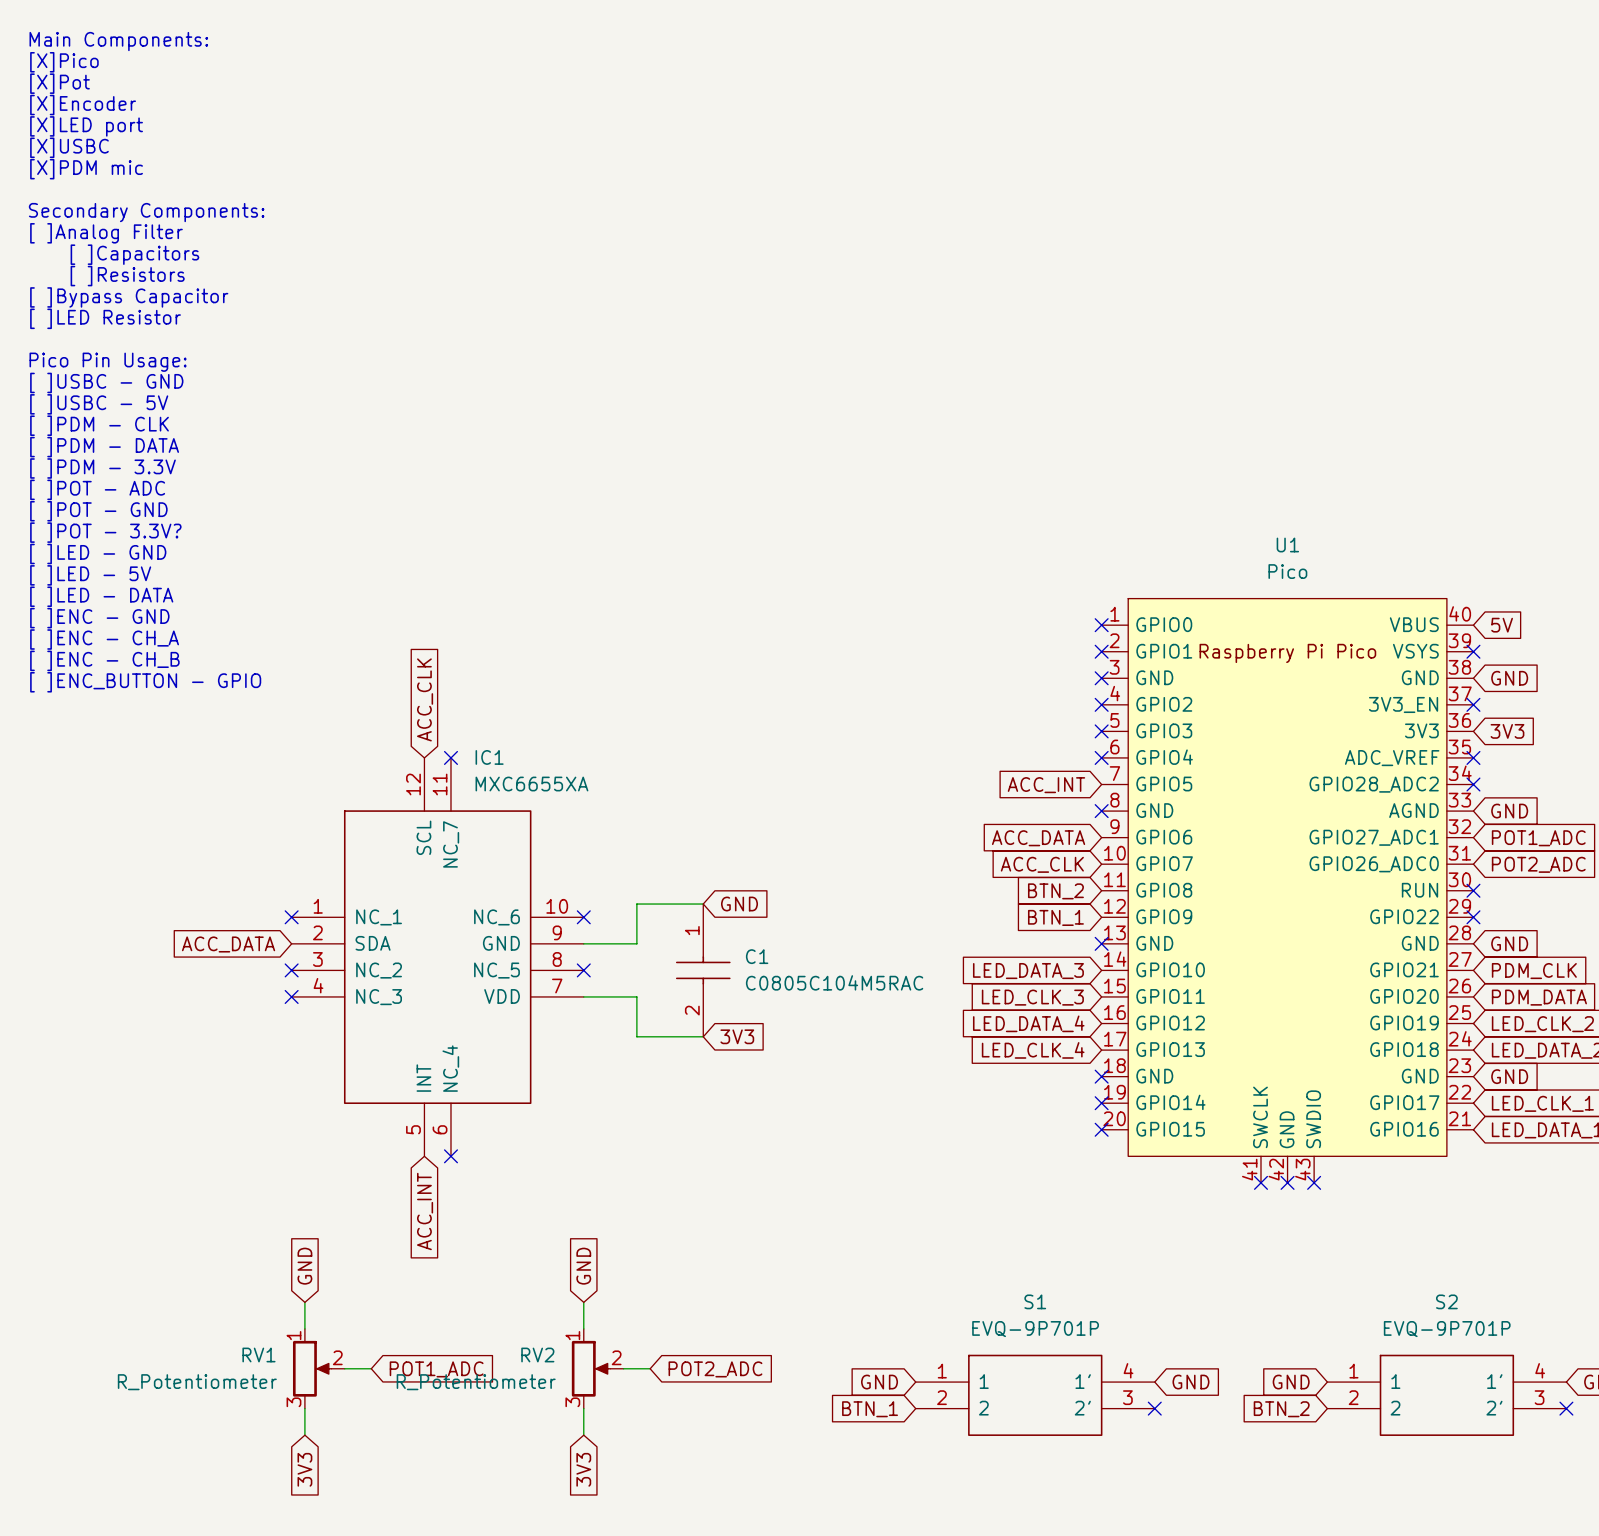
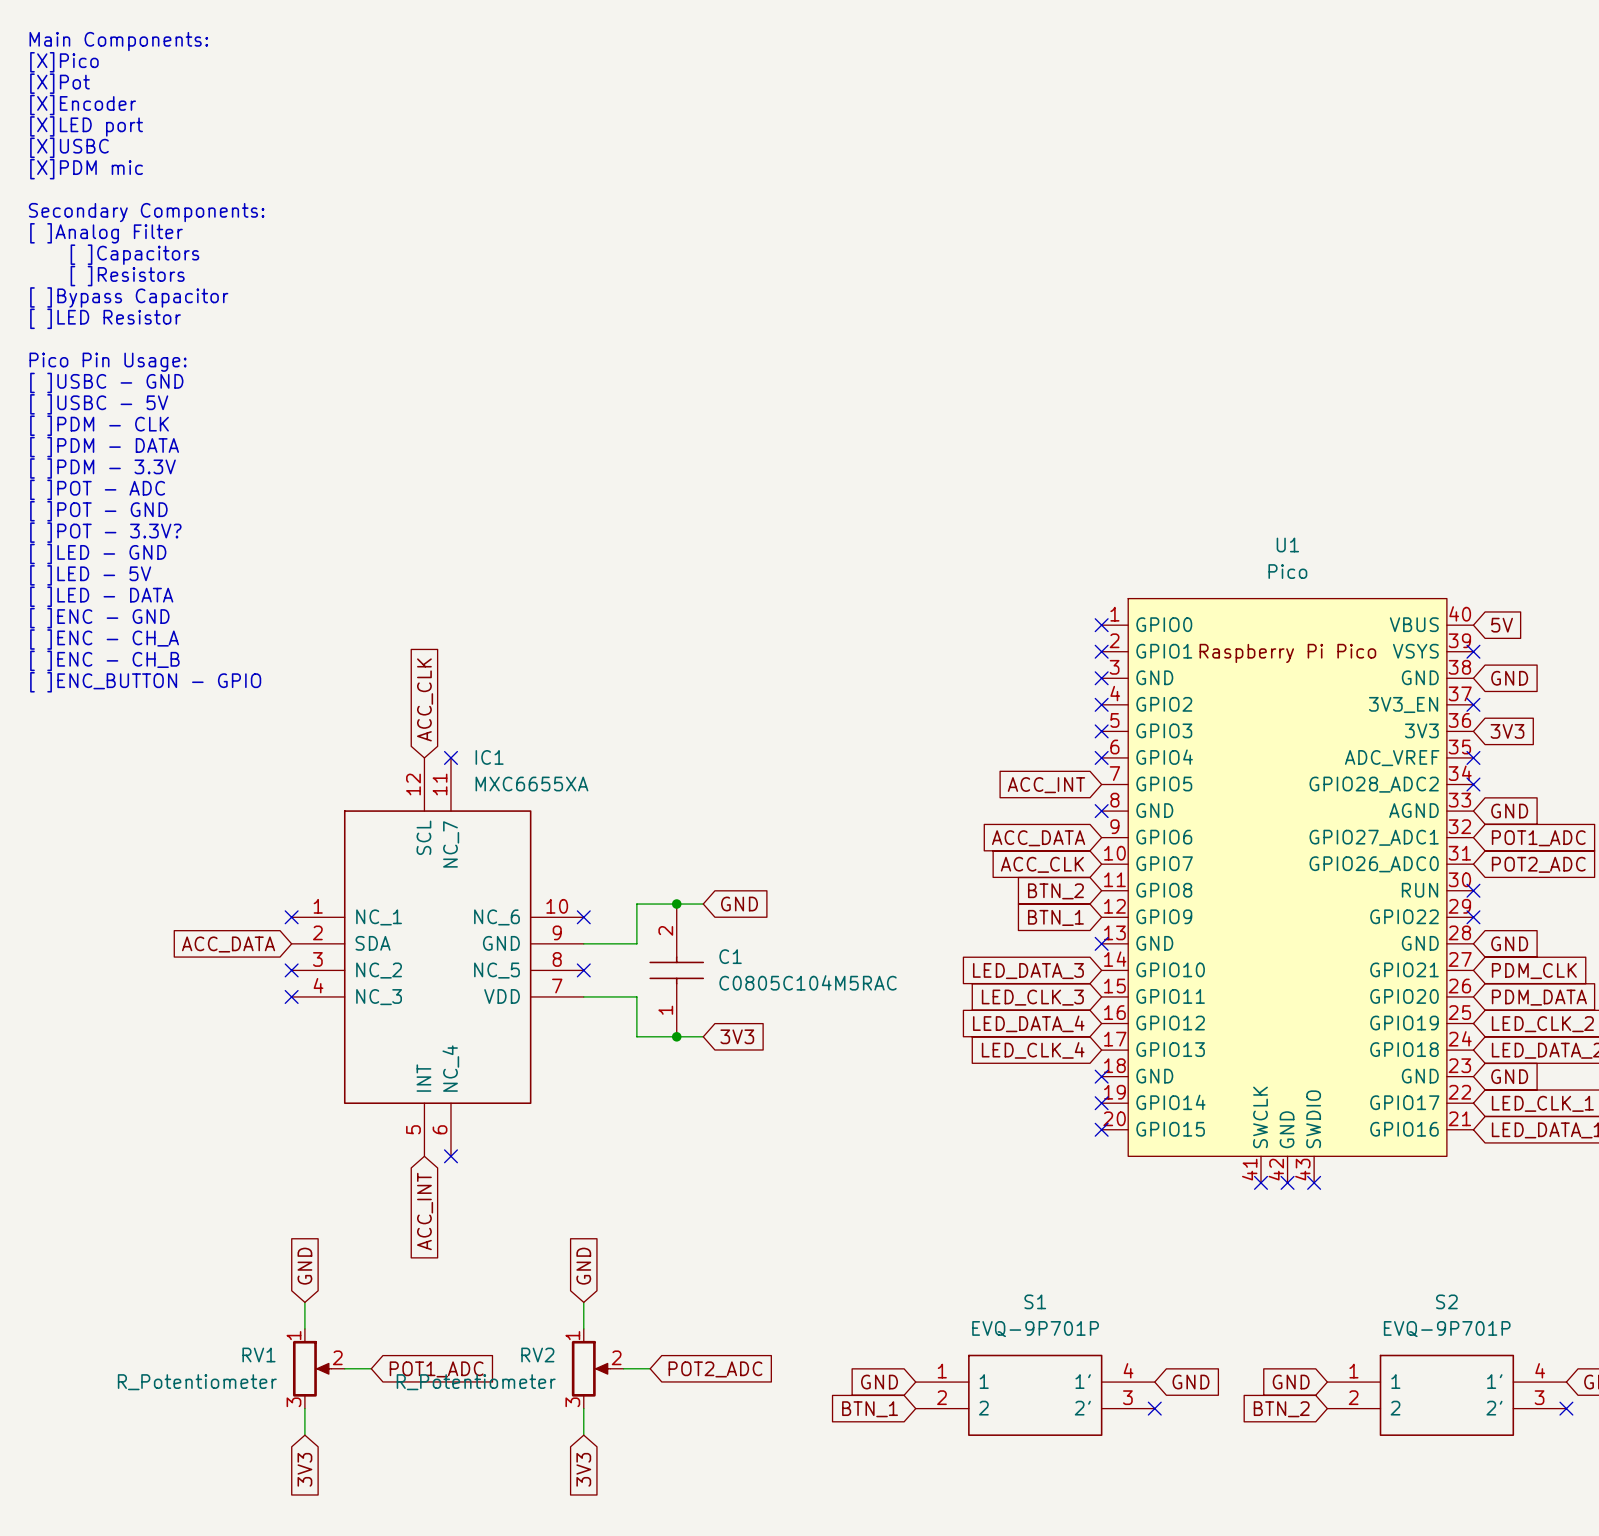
junction: none -> (676, 904)
C1 rotation: 0° (703, 970) -> 180° (676, 970)
junction: none -> (676, 1036)

